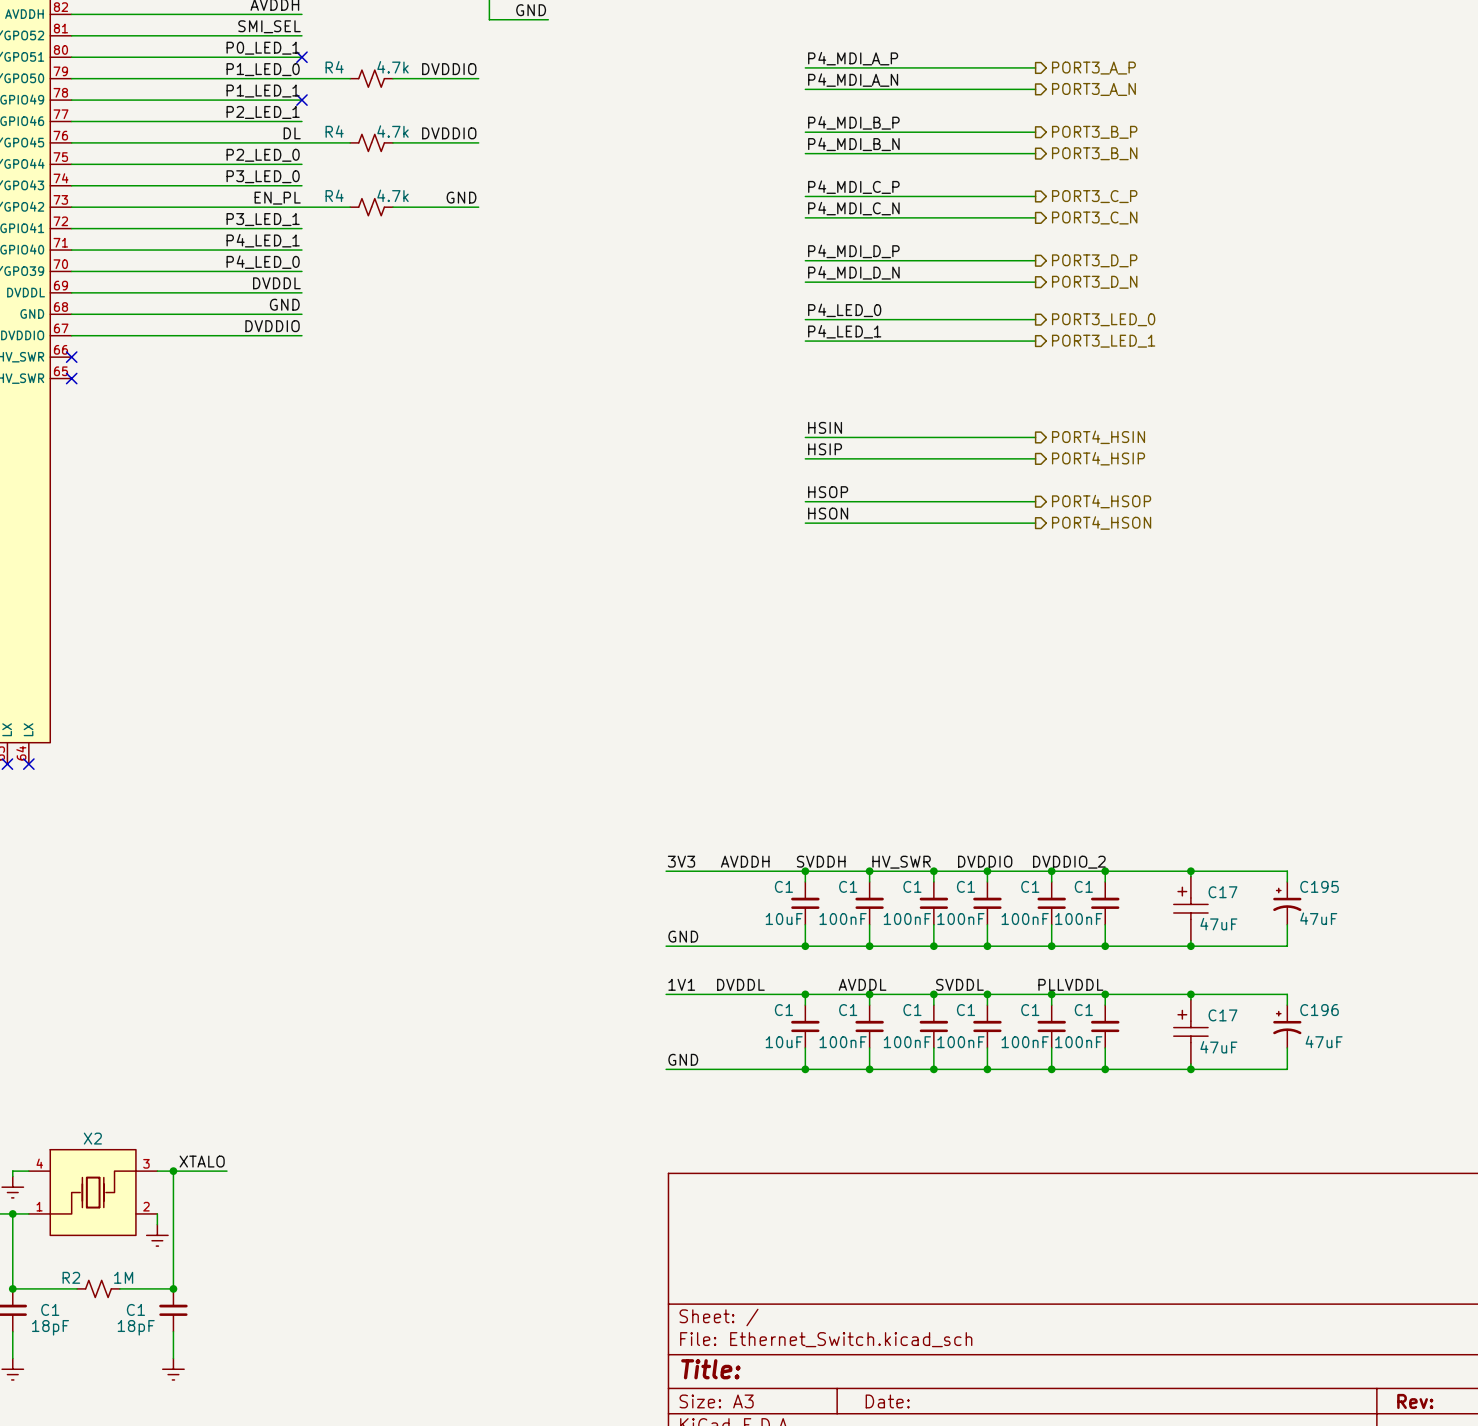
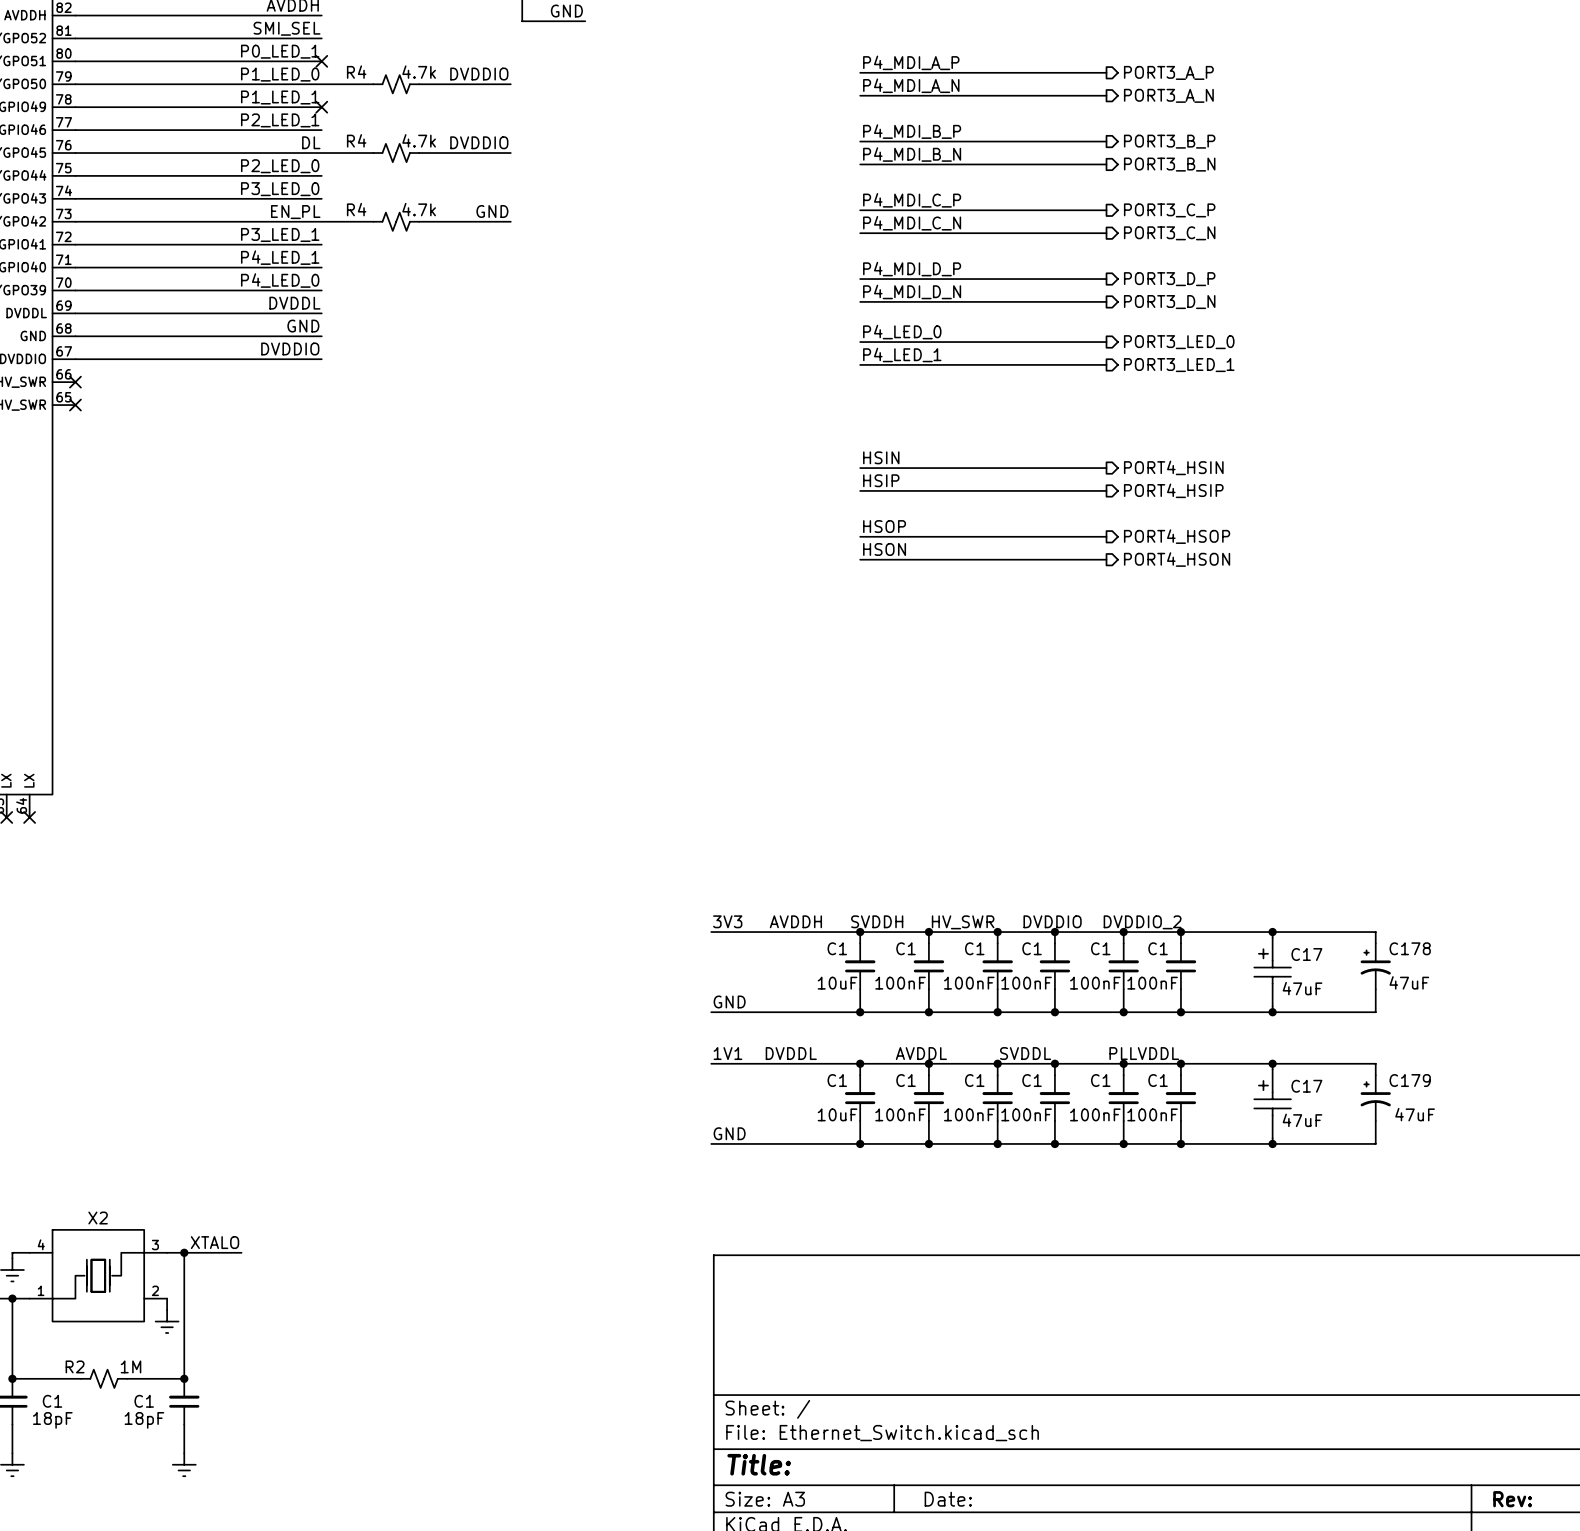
C195 name: C195 (1319, 886) -> C178 (1410, 948)
C196 name: C196 (1319, 1010) -> C179 (1410, 1080)

